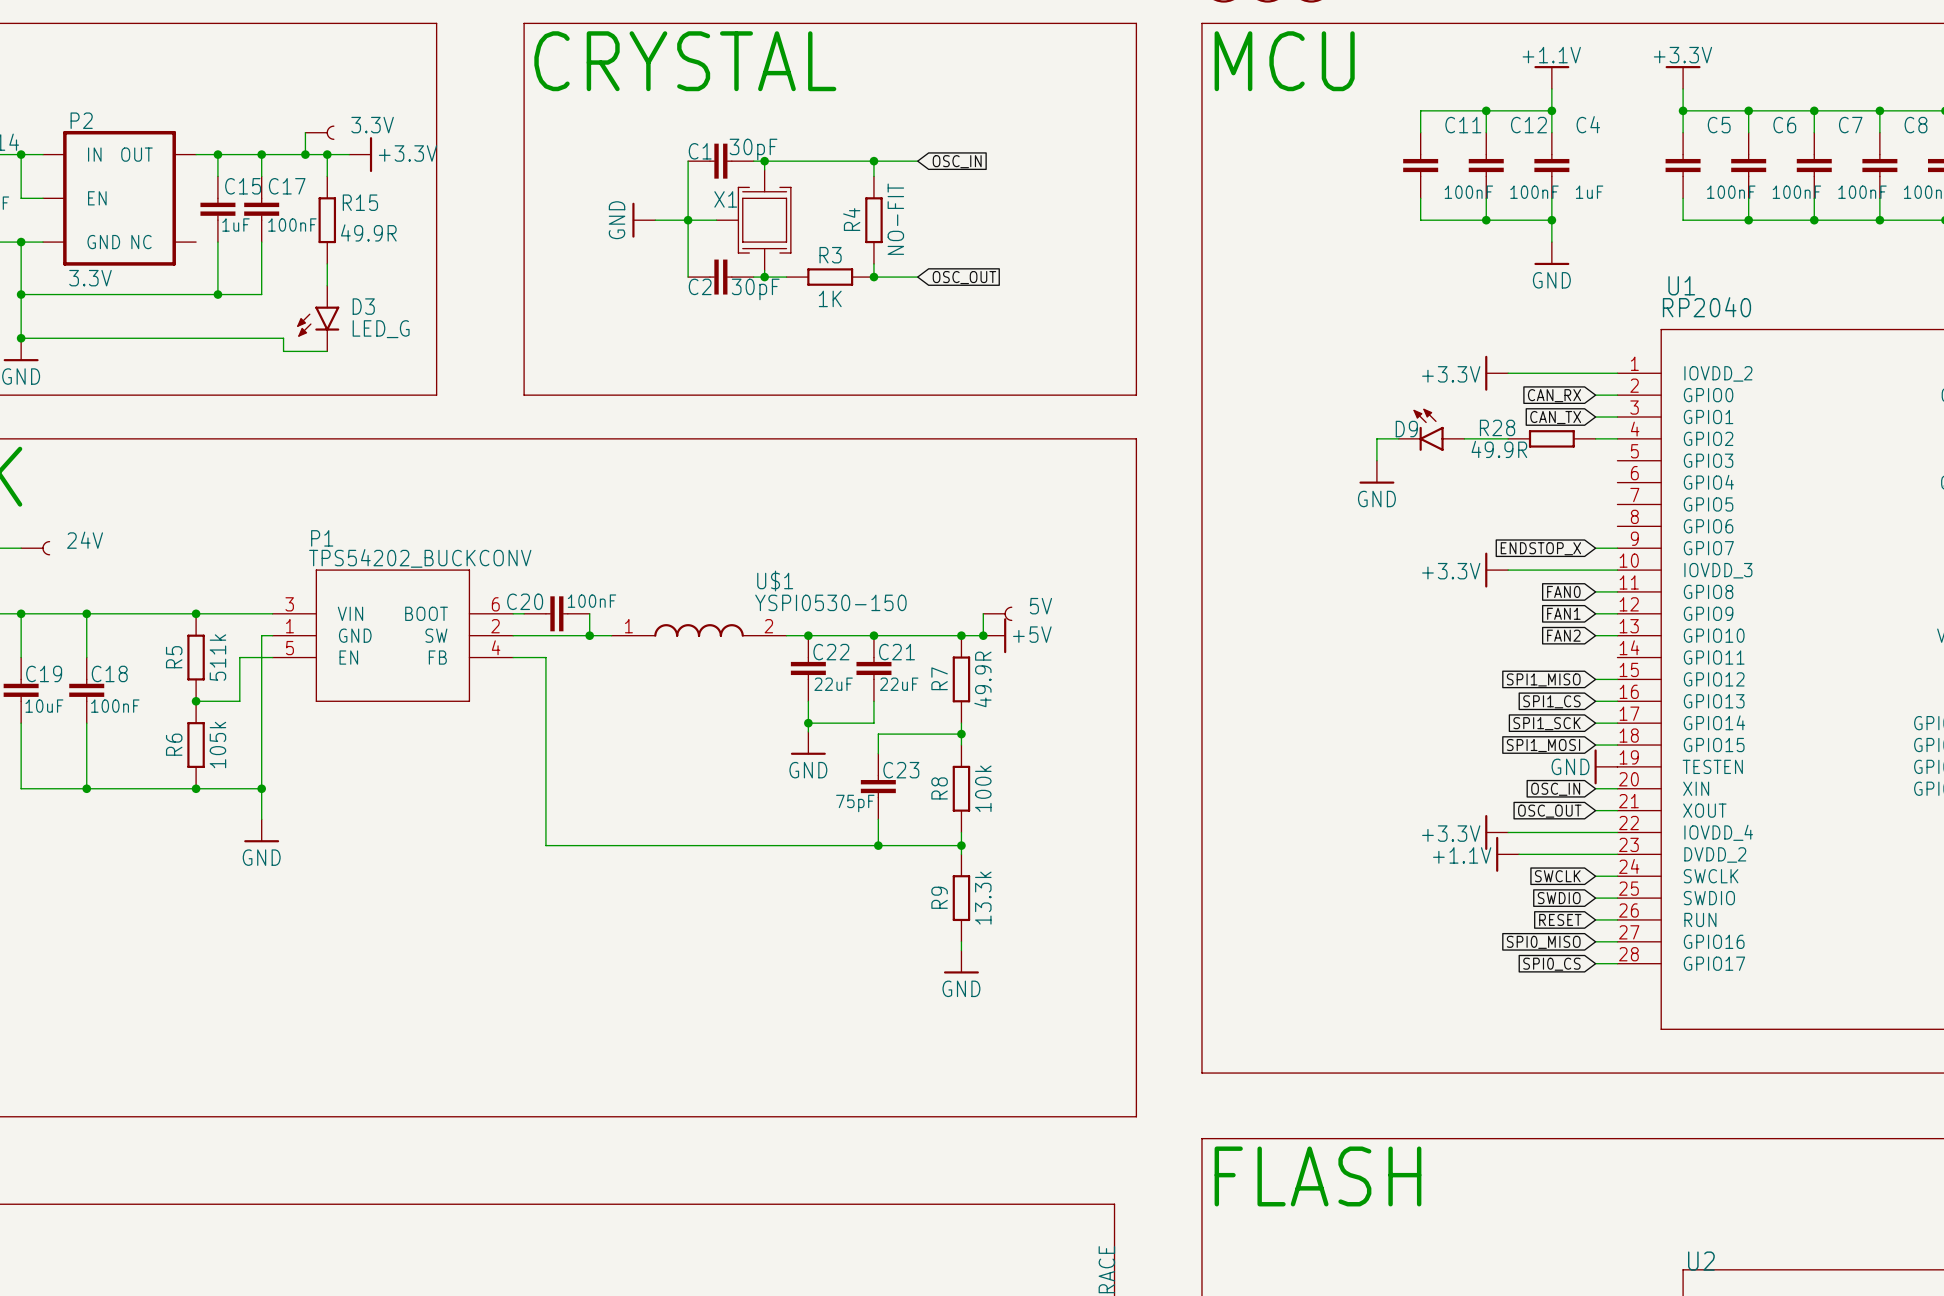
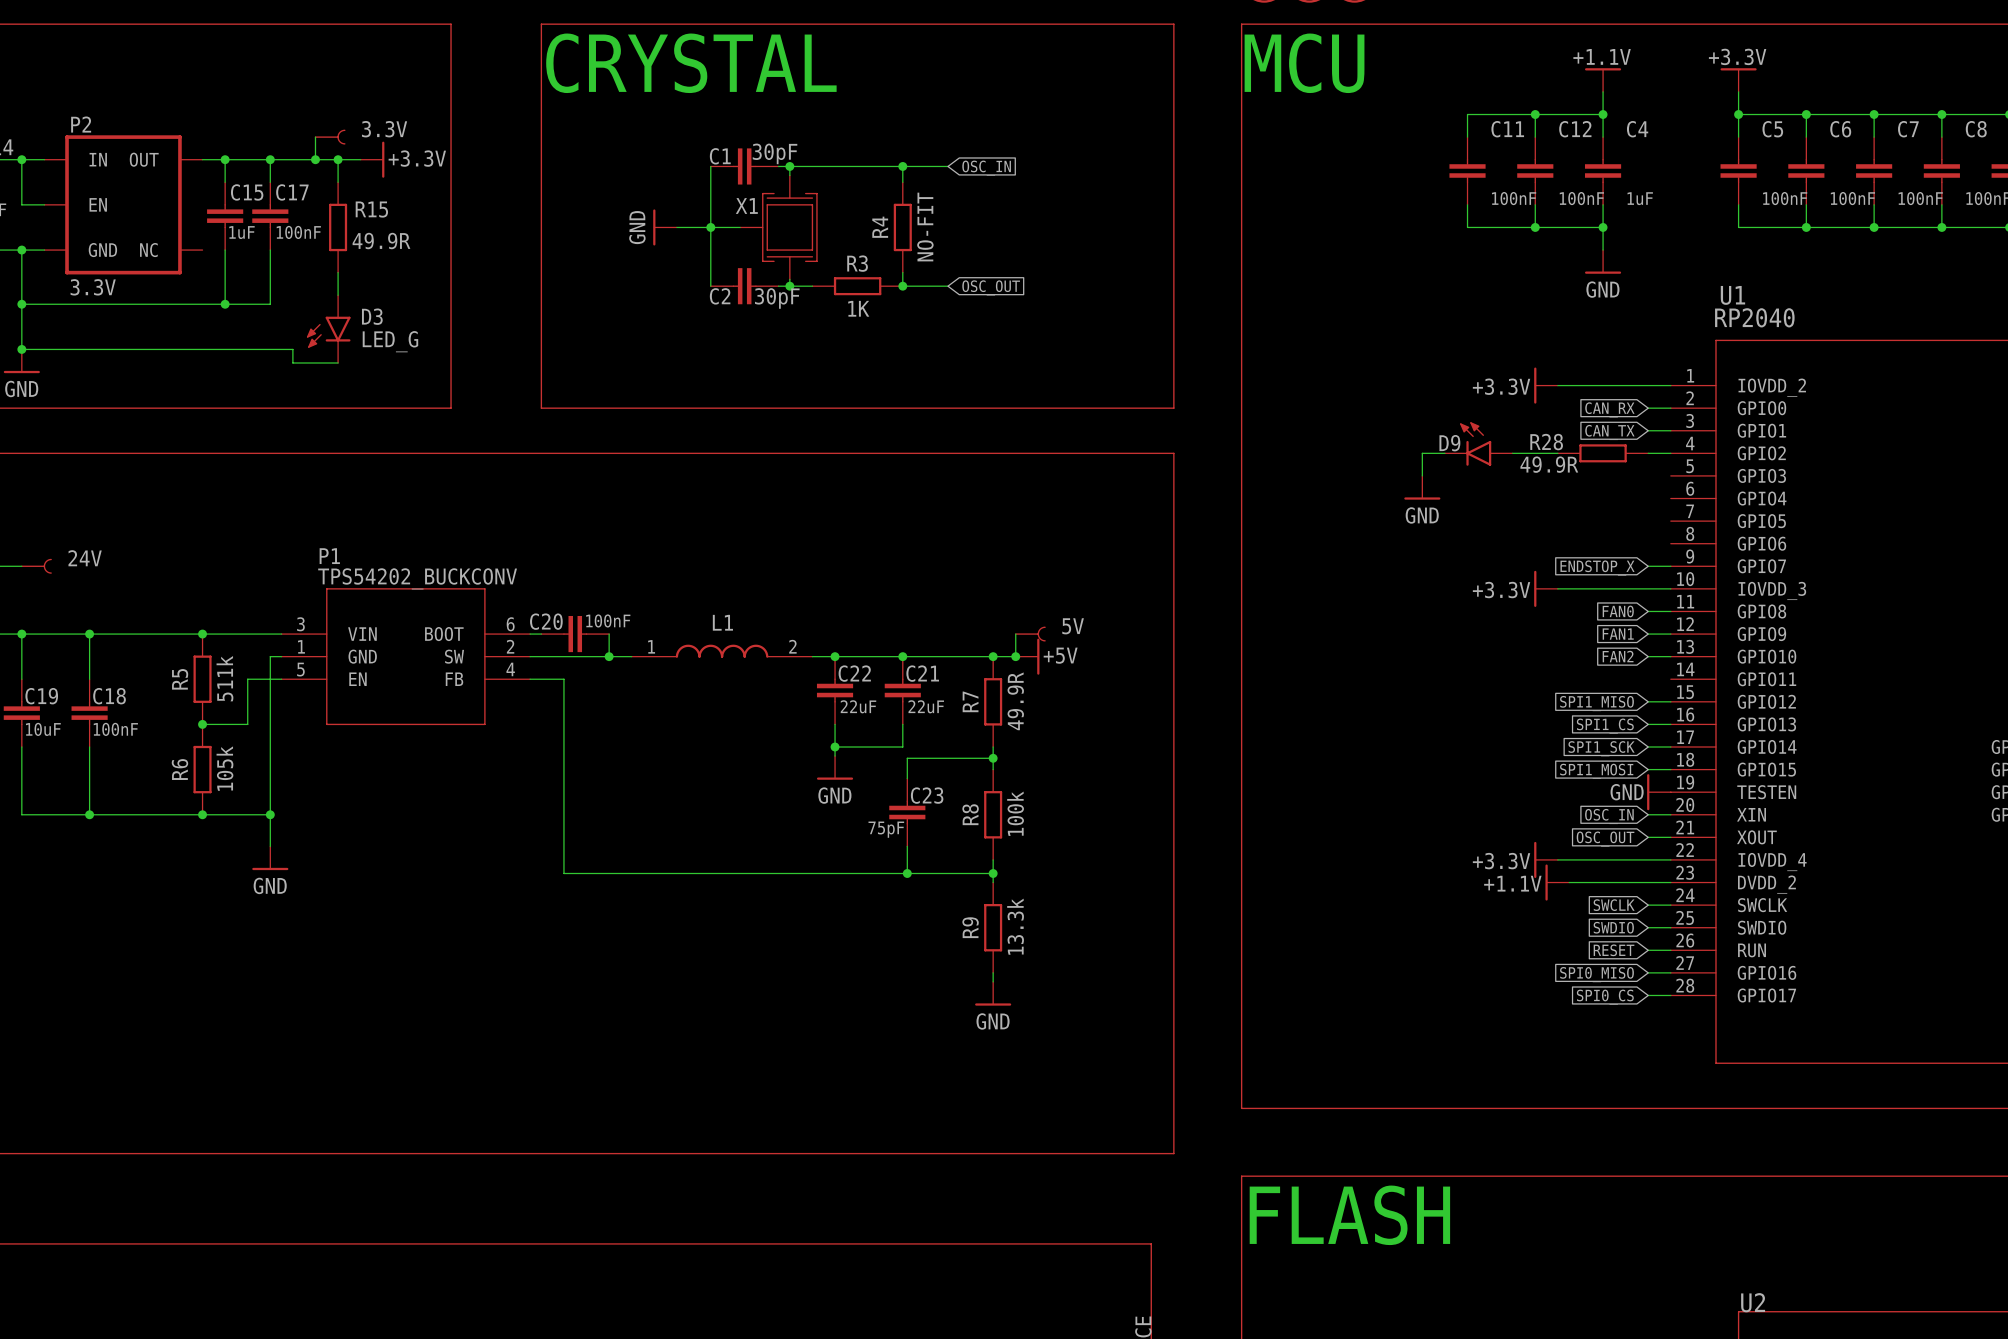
U$1 name: U$1 (775, 581) -> L1 (722, 622)
U$1 value: YSPI0530-150 (830, 602) -> none

